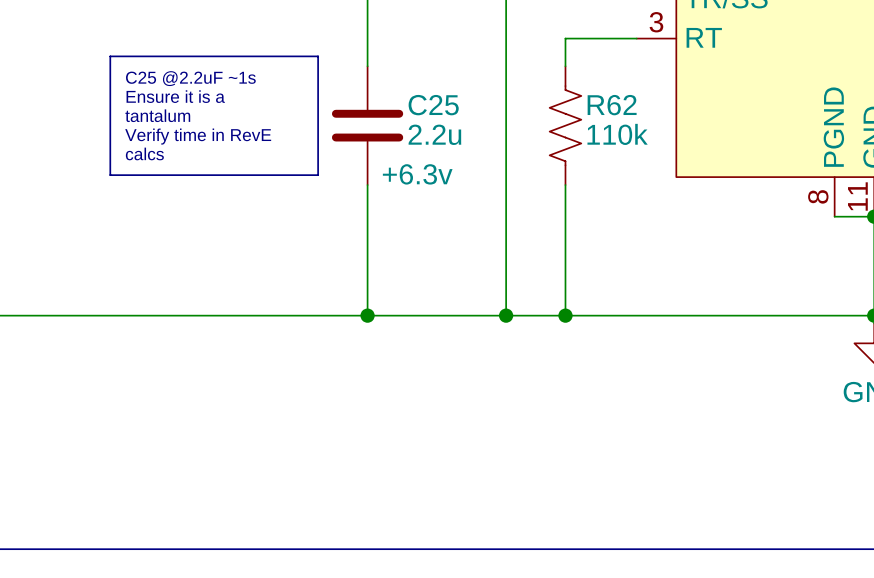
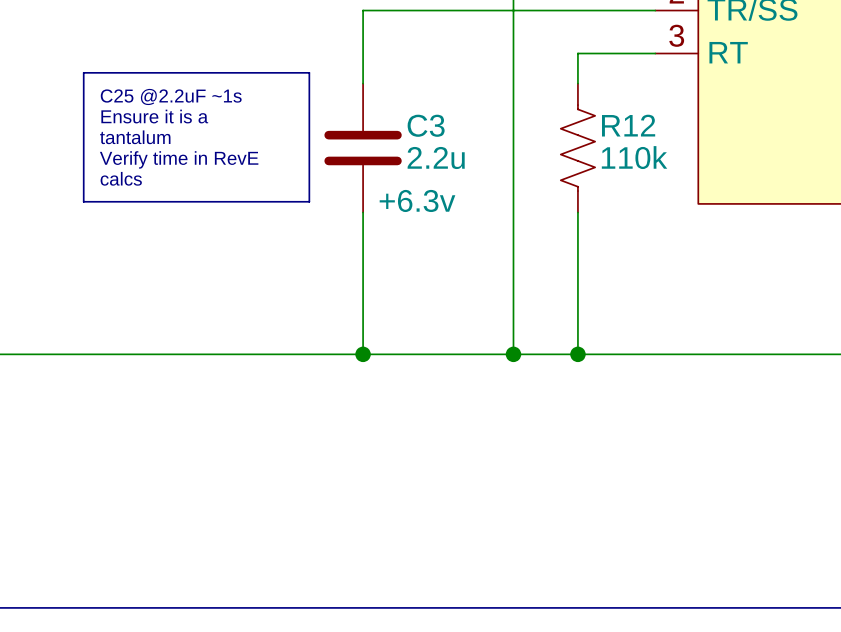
C25 name: C25 (433, 105) -> C3 (426, 125)
R62 name: R62 (612, 105) -> R12 (628, 125)

